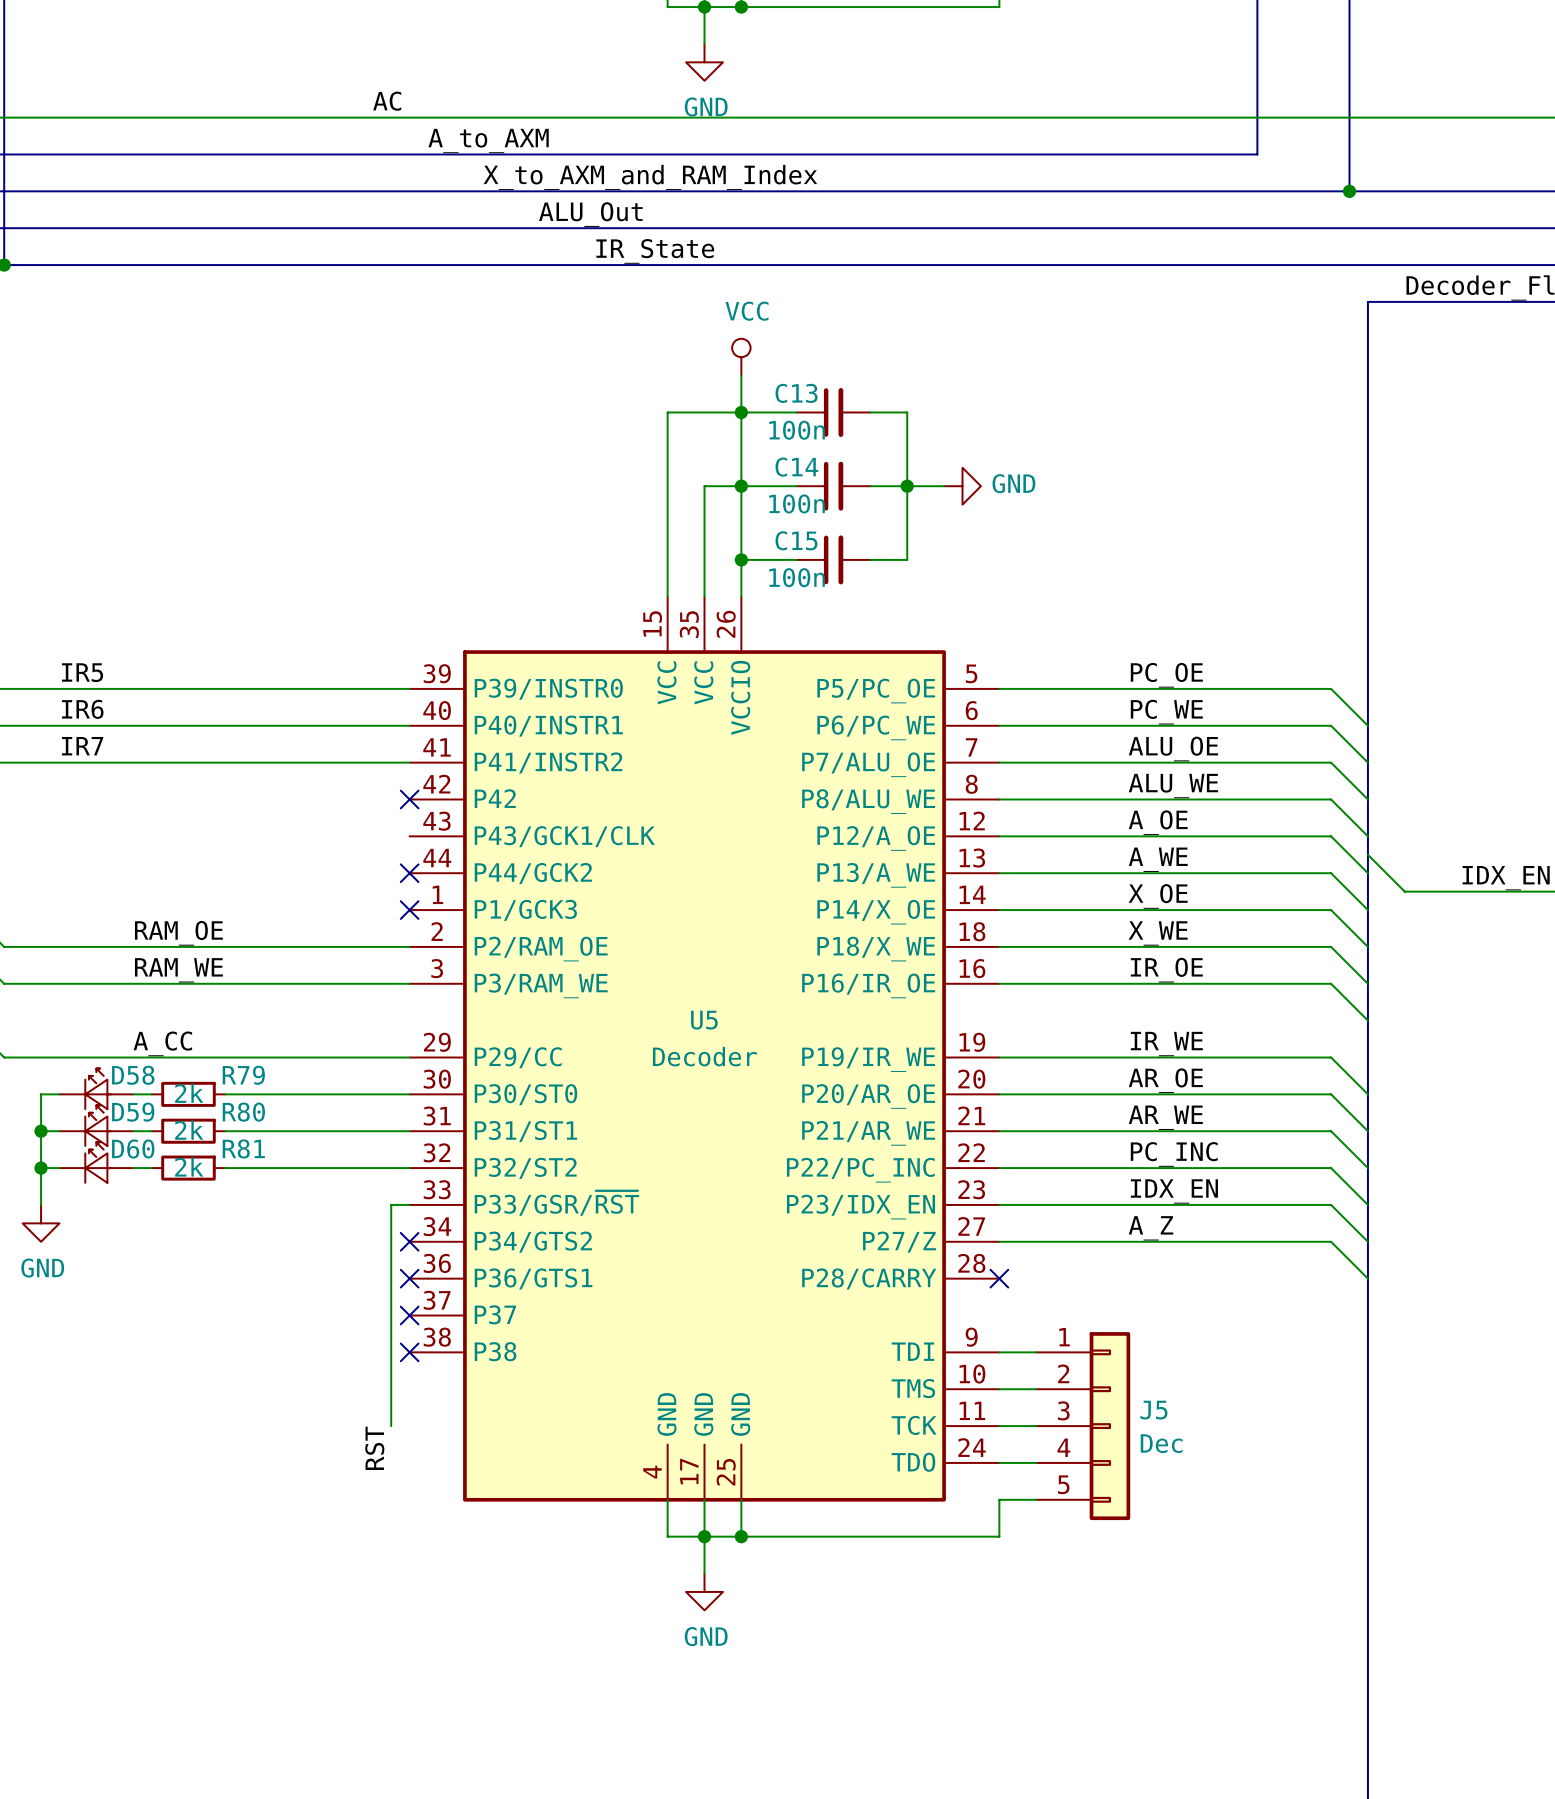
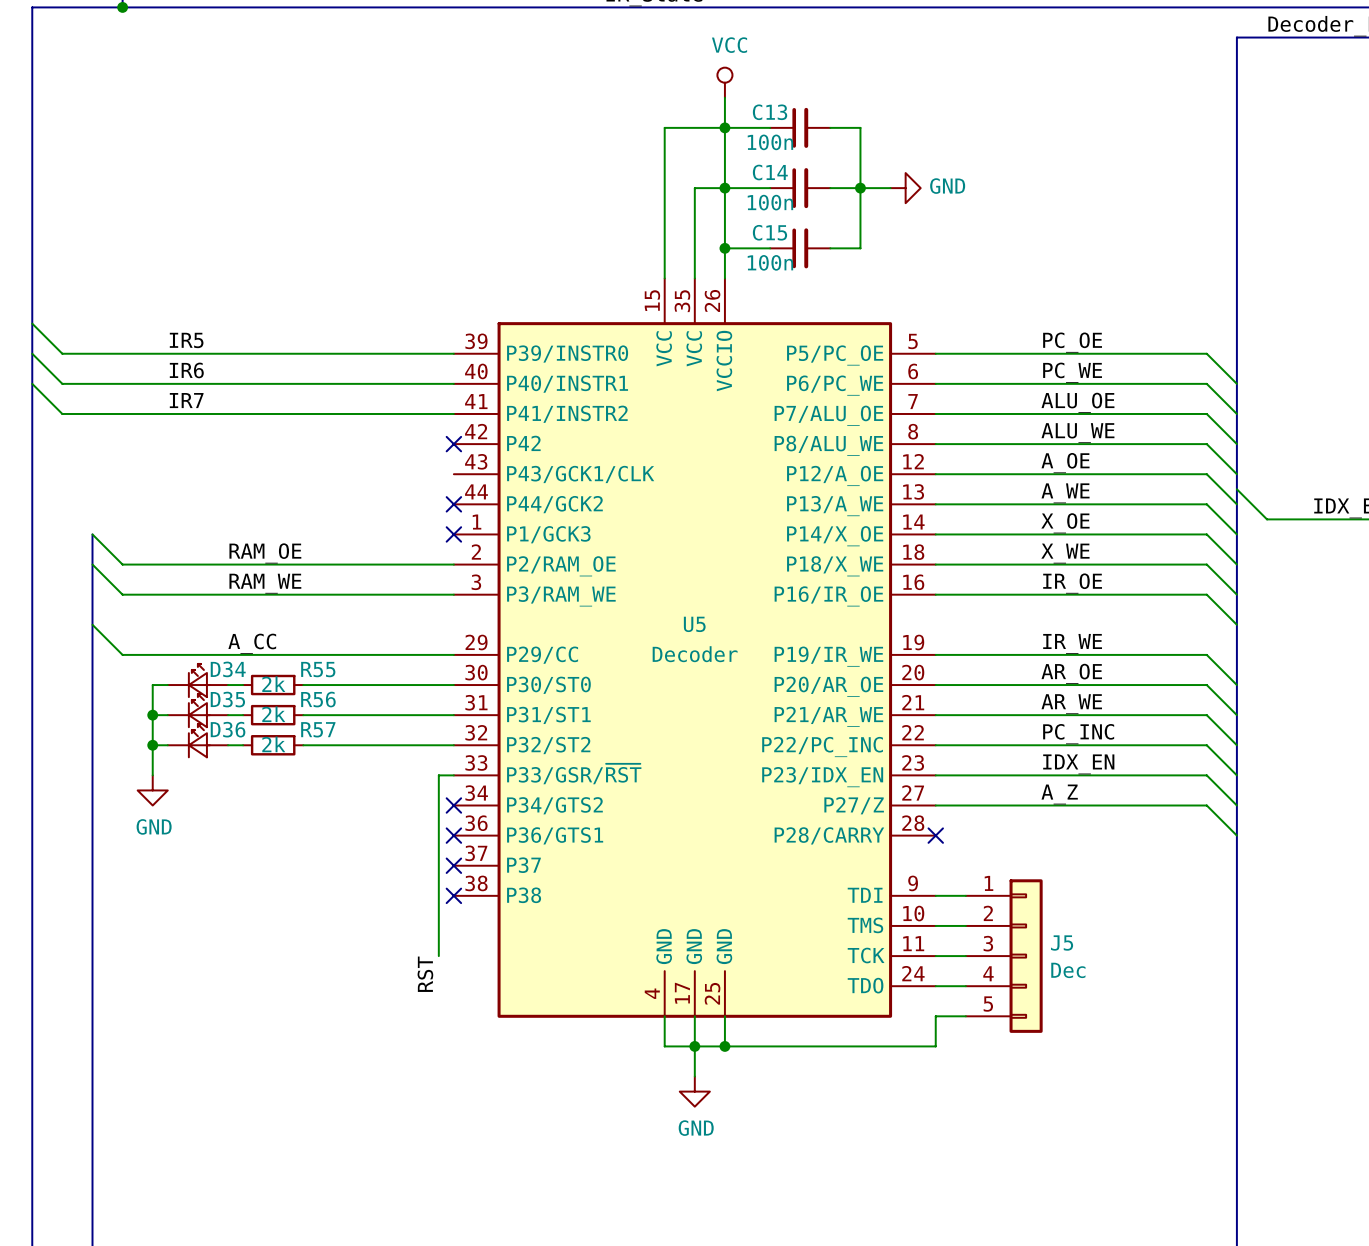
D58 name: D58 (133, 1075) -> D34 (228, 669)
R79 name: R79 (243, 1075) -> R55 (318, 669)
D59 name: D59 (133, 1112) -> D35 (227, 699)
R80 name: R80 (243, 1112) -> R56 (318, 699)
D60 name: D60 (133, 1148) -> D36 (228, 729)
R81 name: R81 (243, 1148) -> R57 (318, 729)

